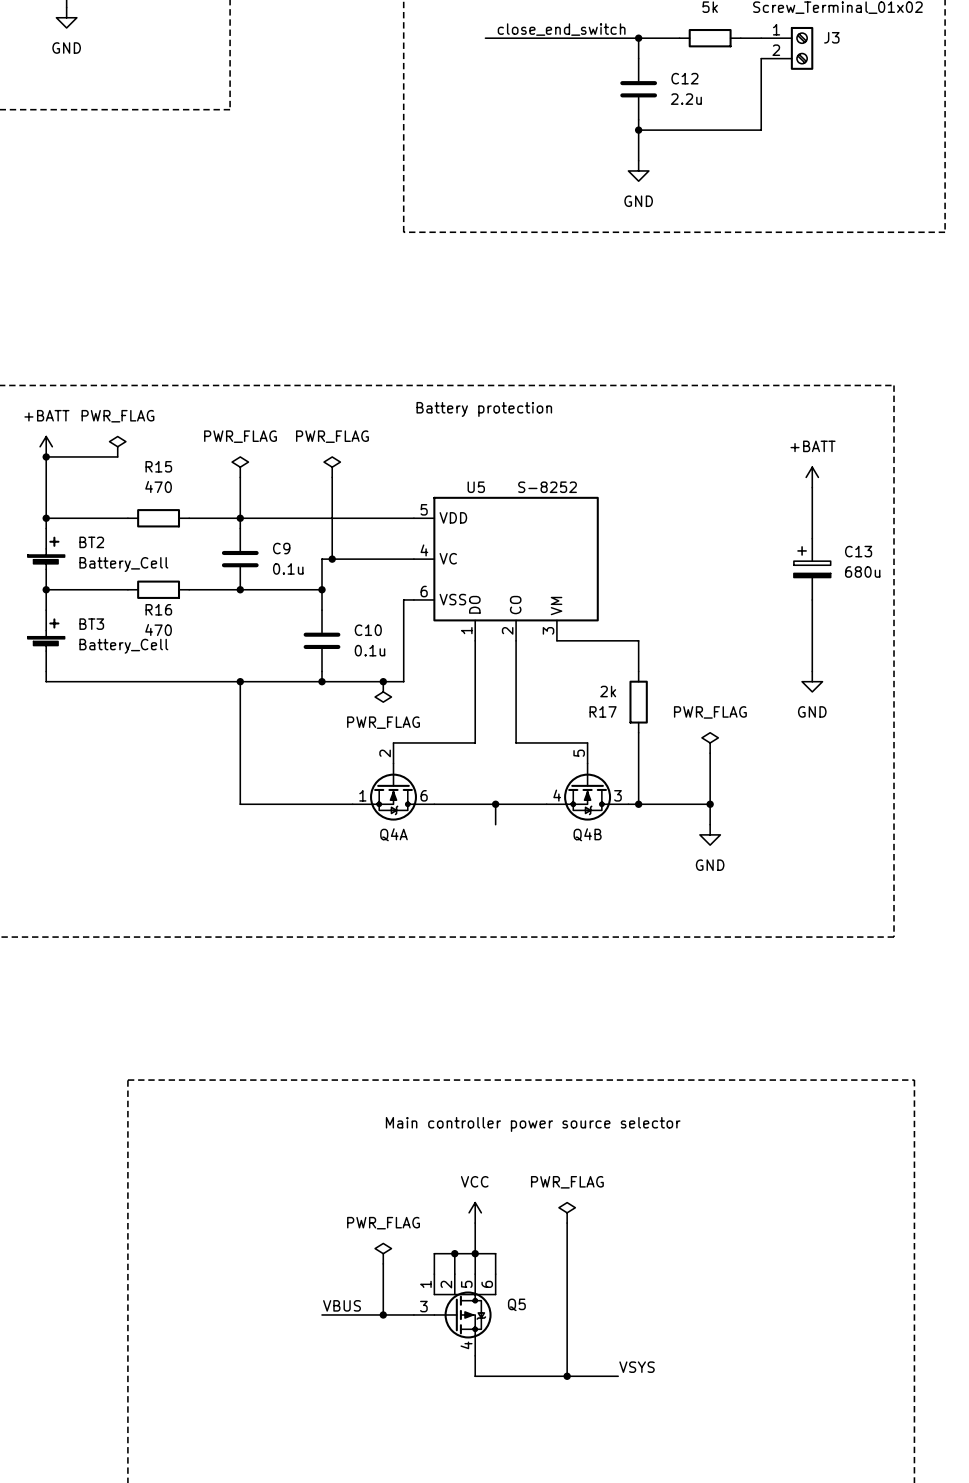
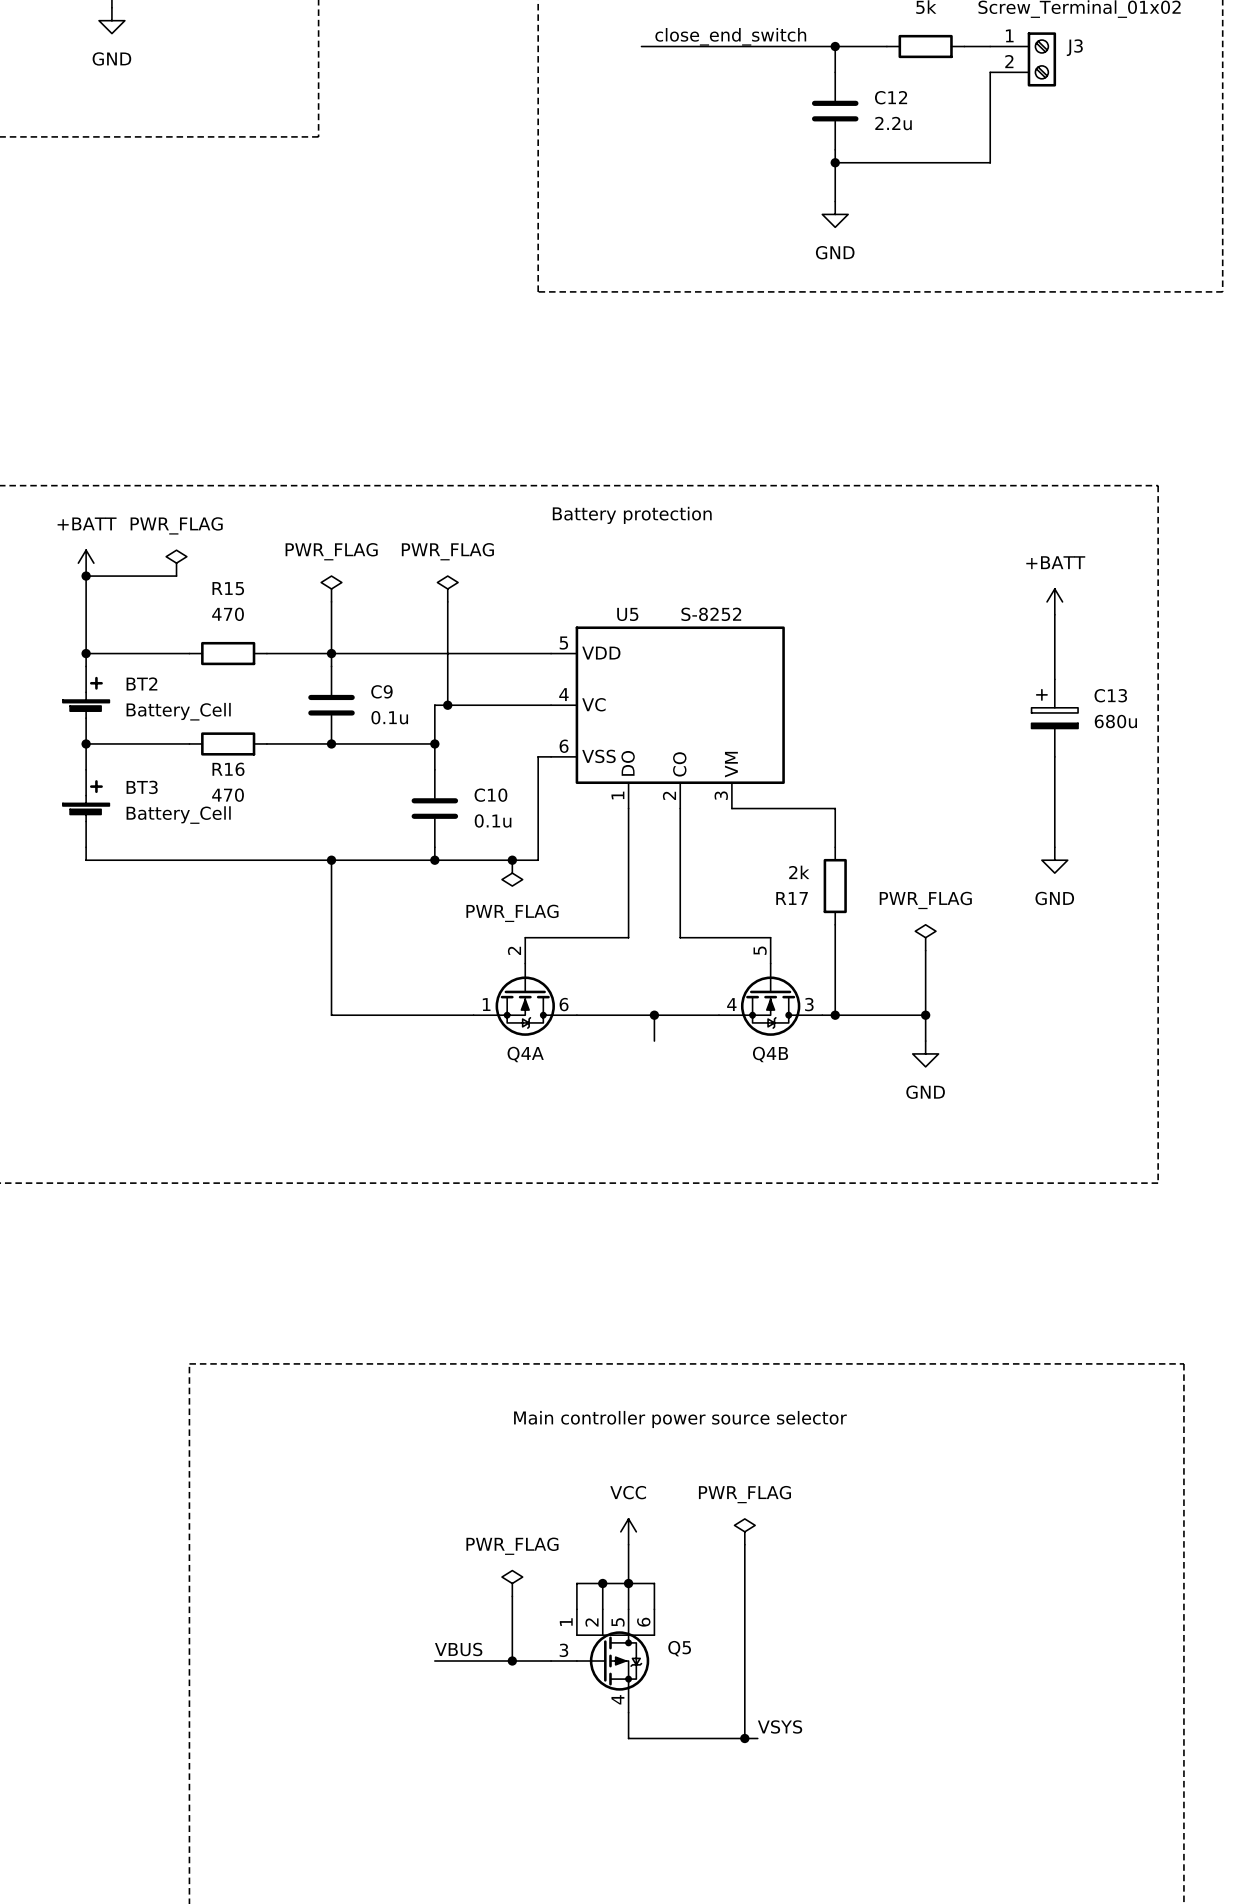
label position: VSYS (637, 1367) -> VSYS (780, 1726)
wire: (577, 1376) (618, 1376) -> none

